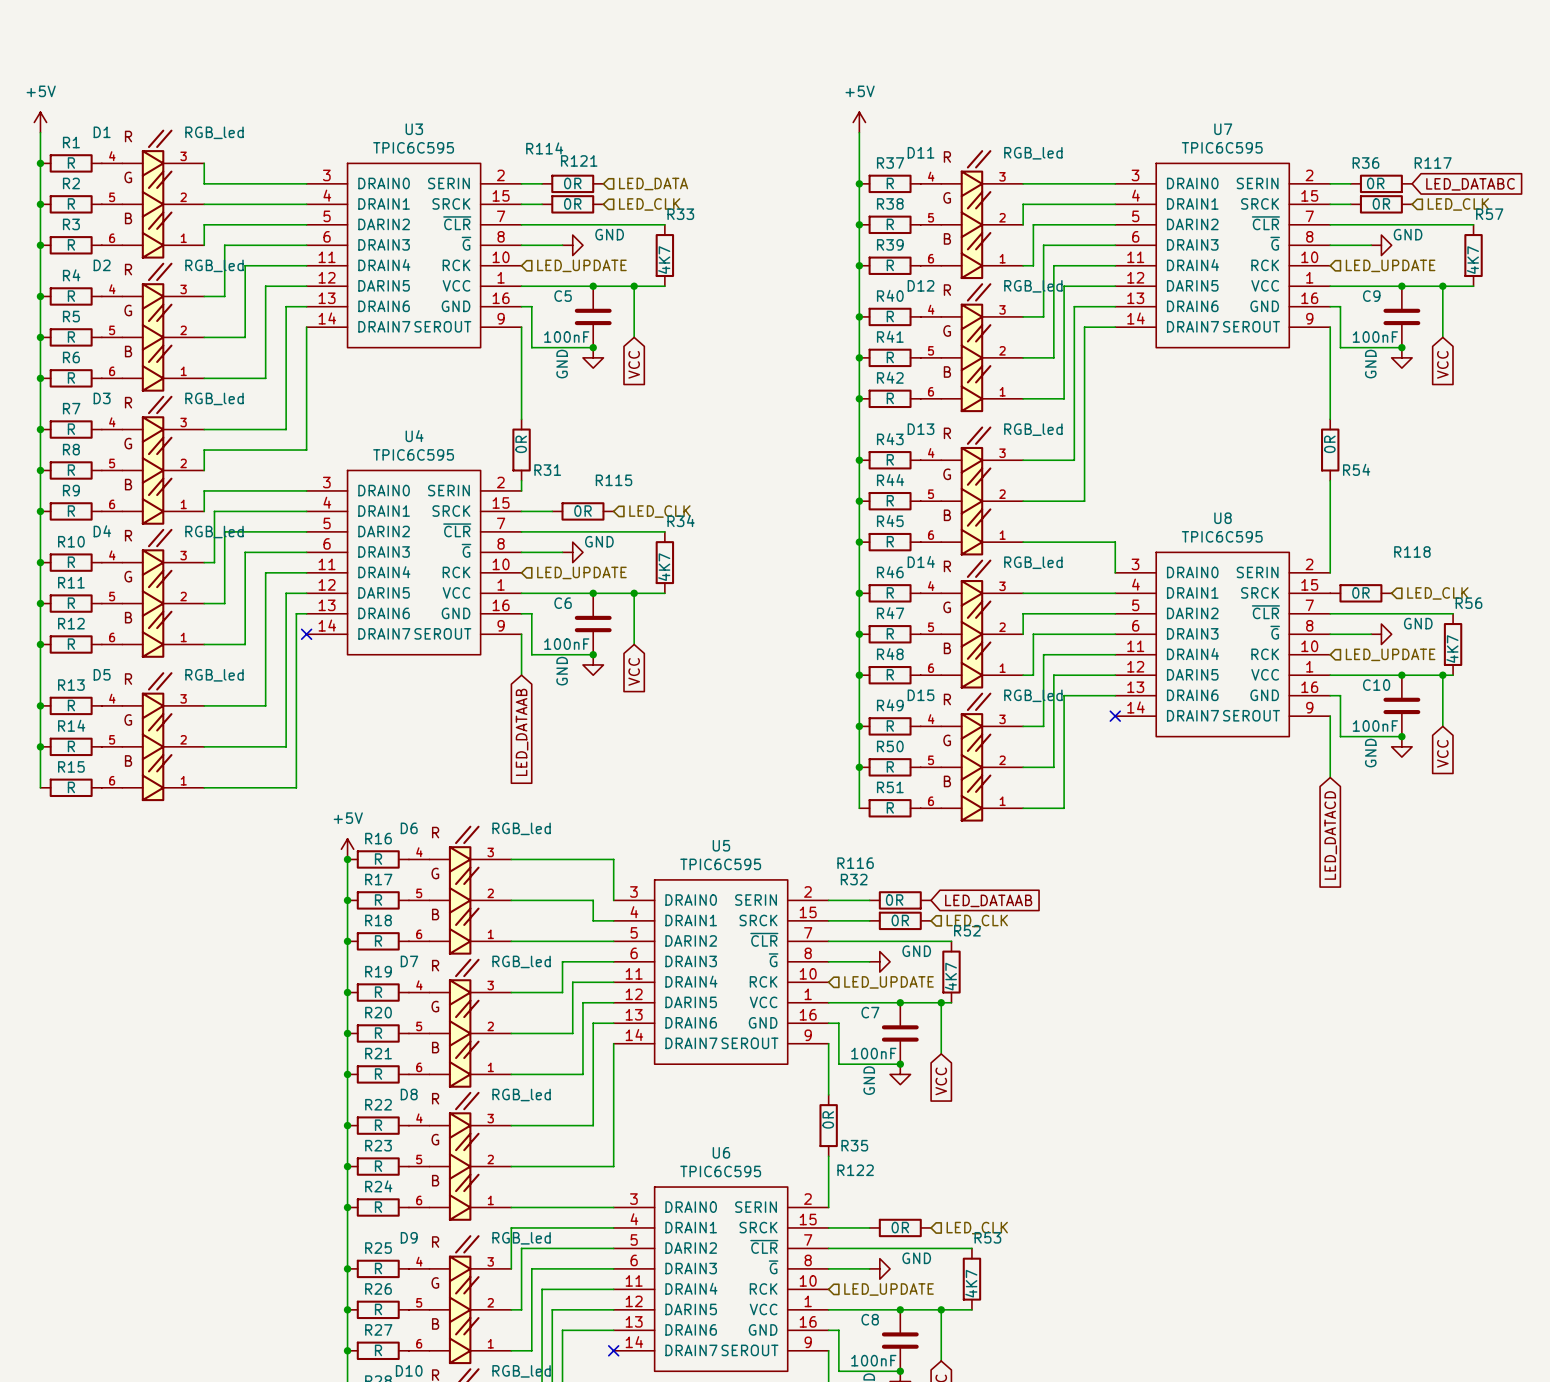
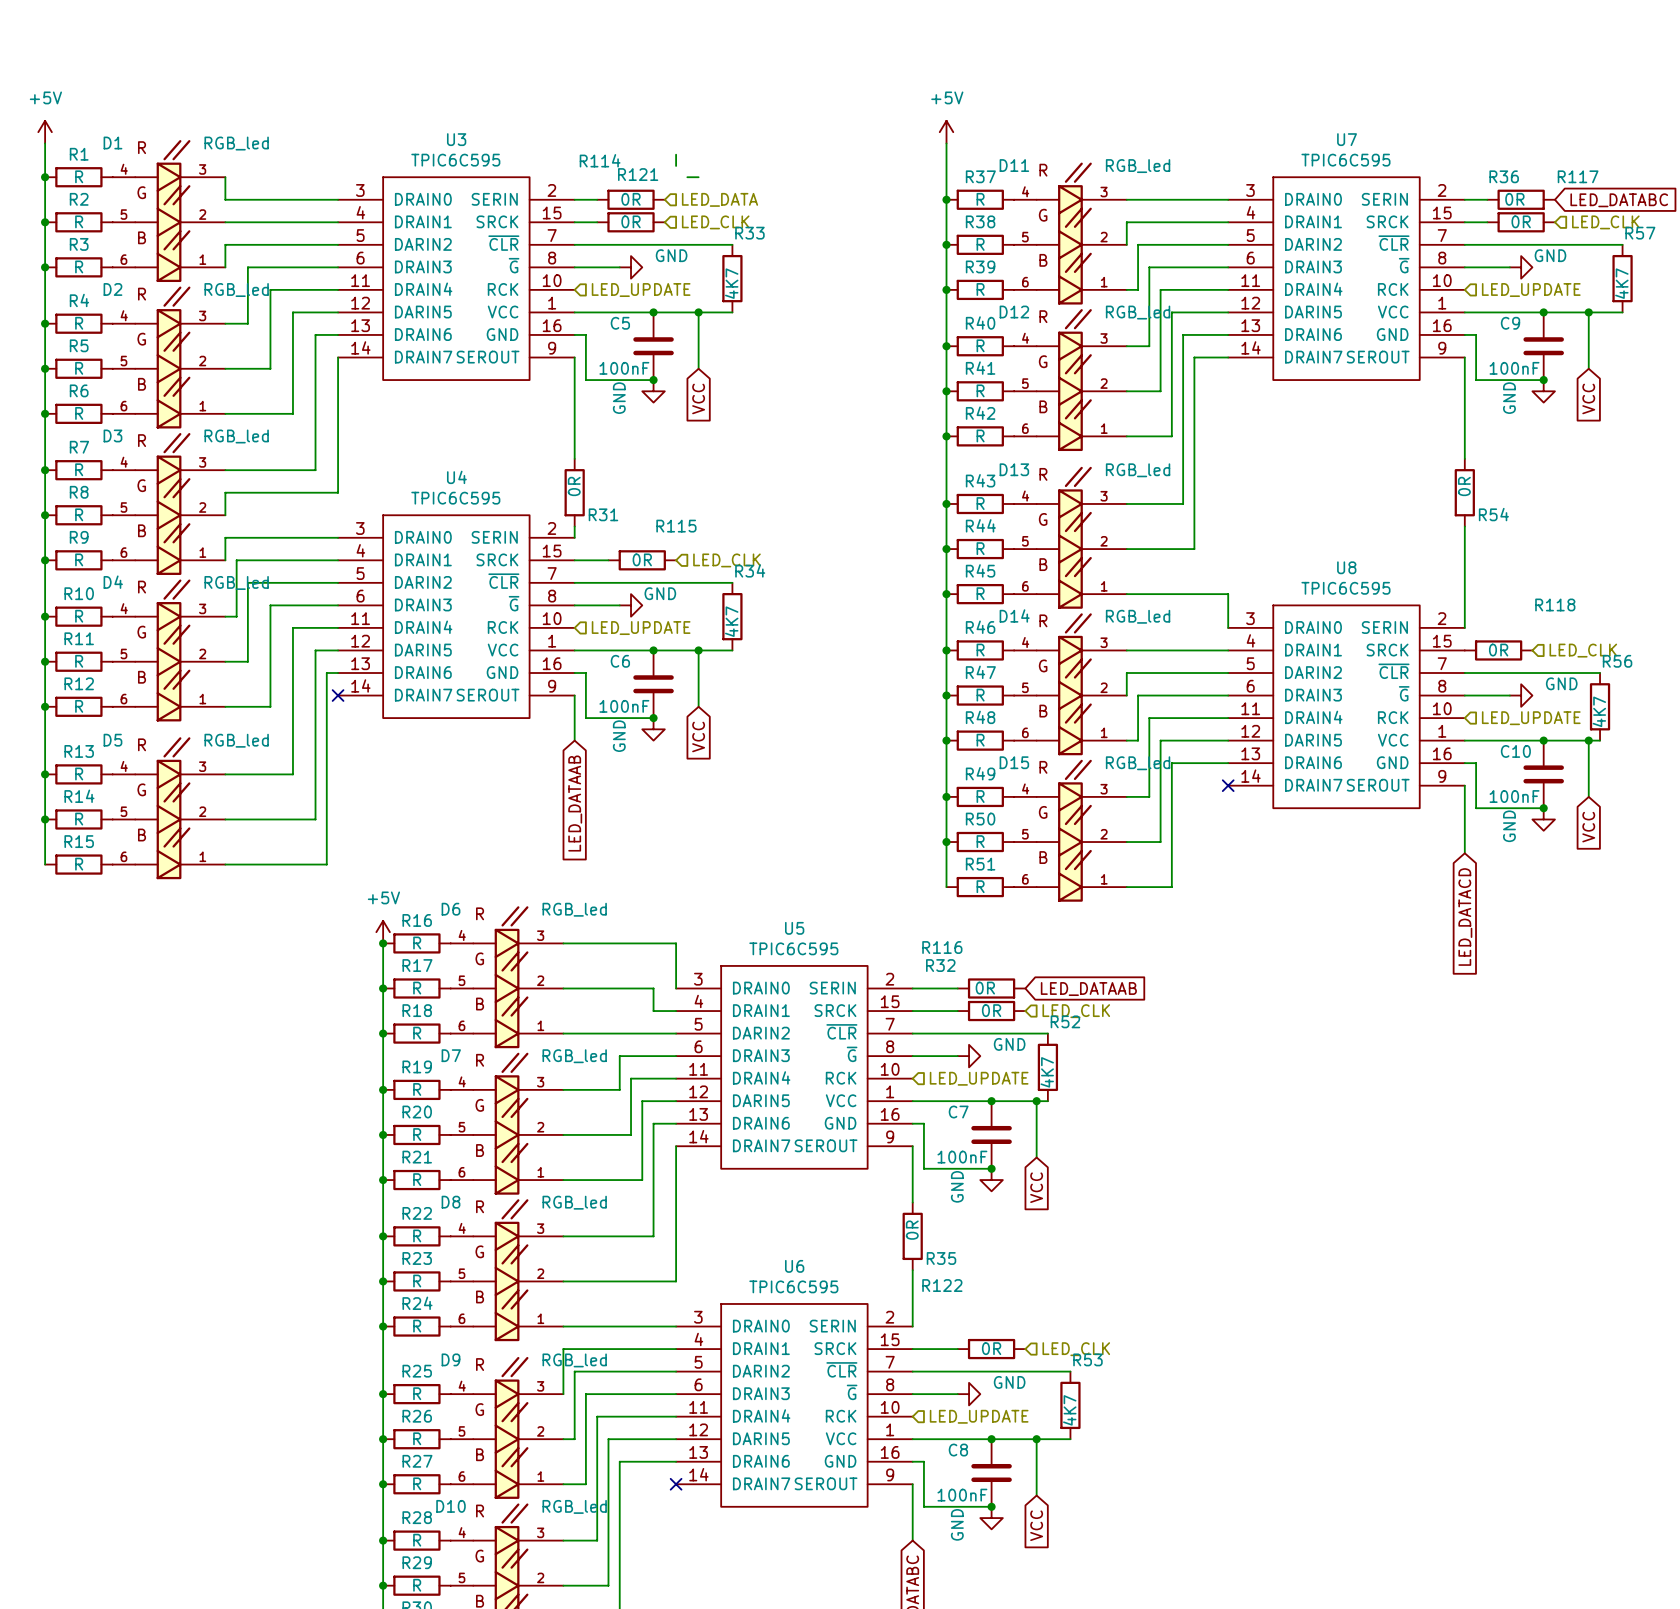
wire: none -> (676, 154) (676, 165)
wire: none -> (687, 177) (698, 177)

